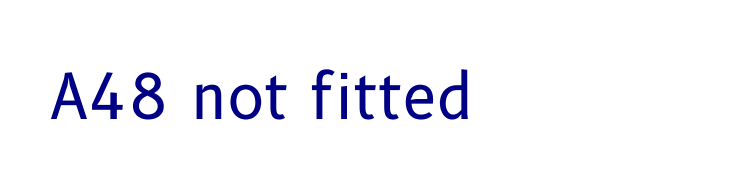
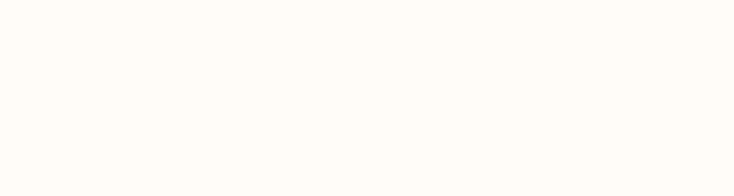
text: A48 not fitted (259, 94) -> none

